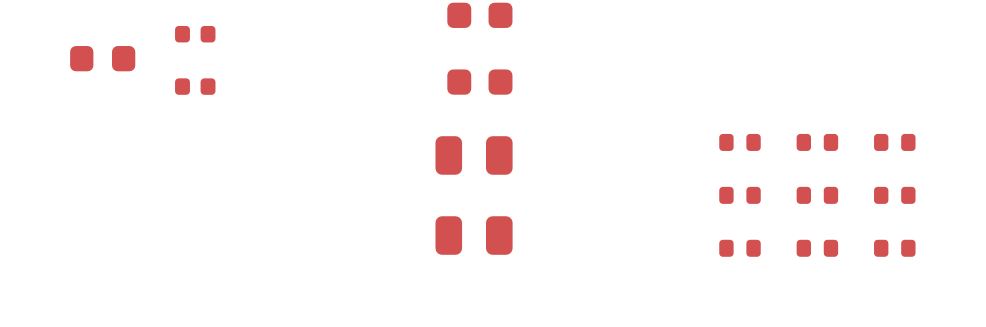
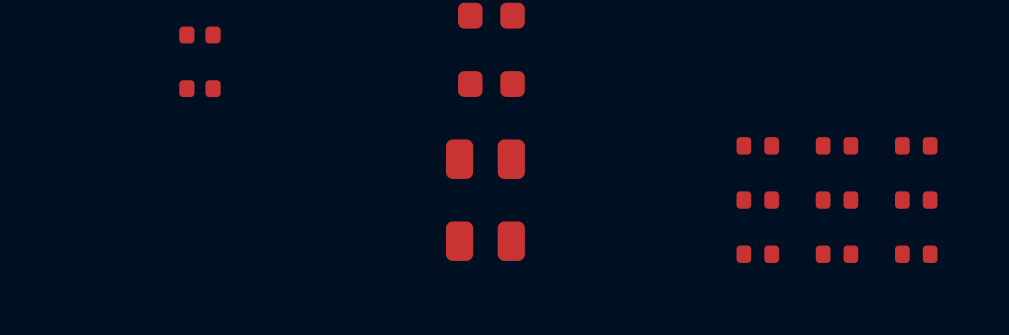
part: (102, 58) -> none

